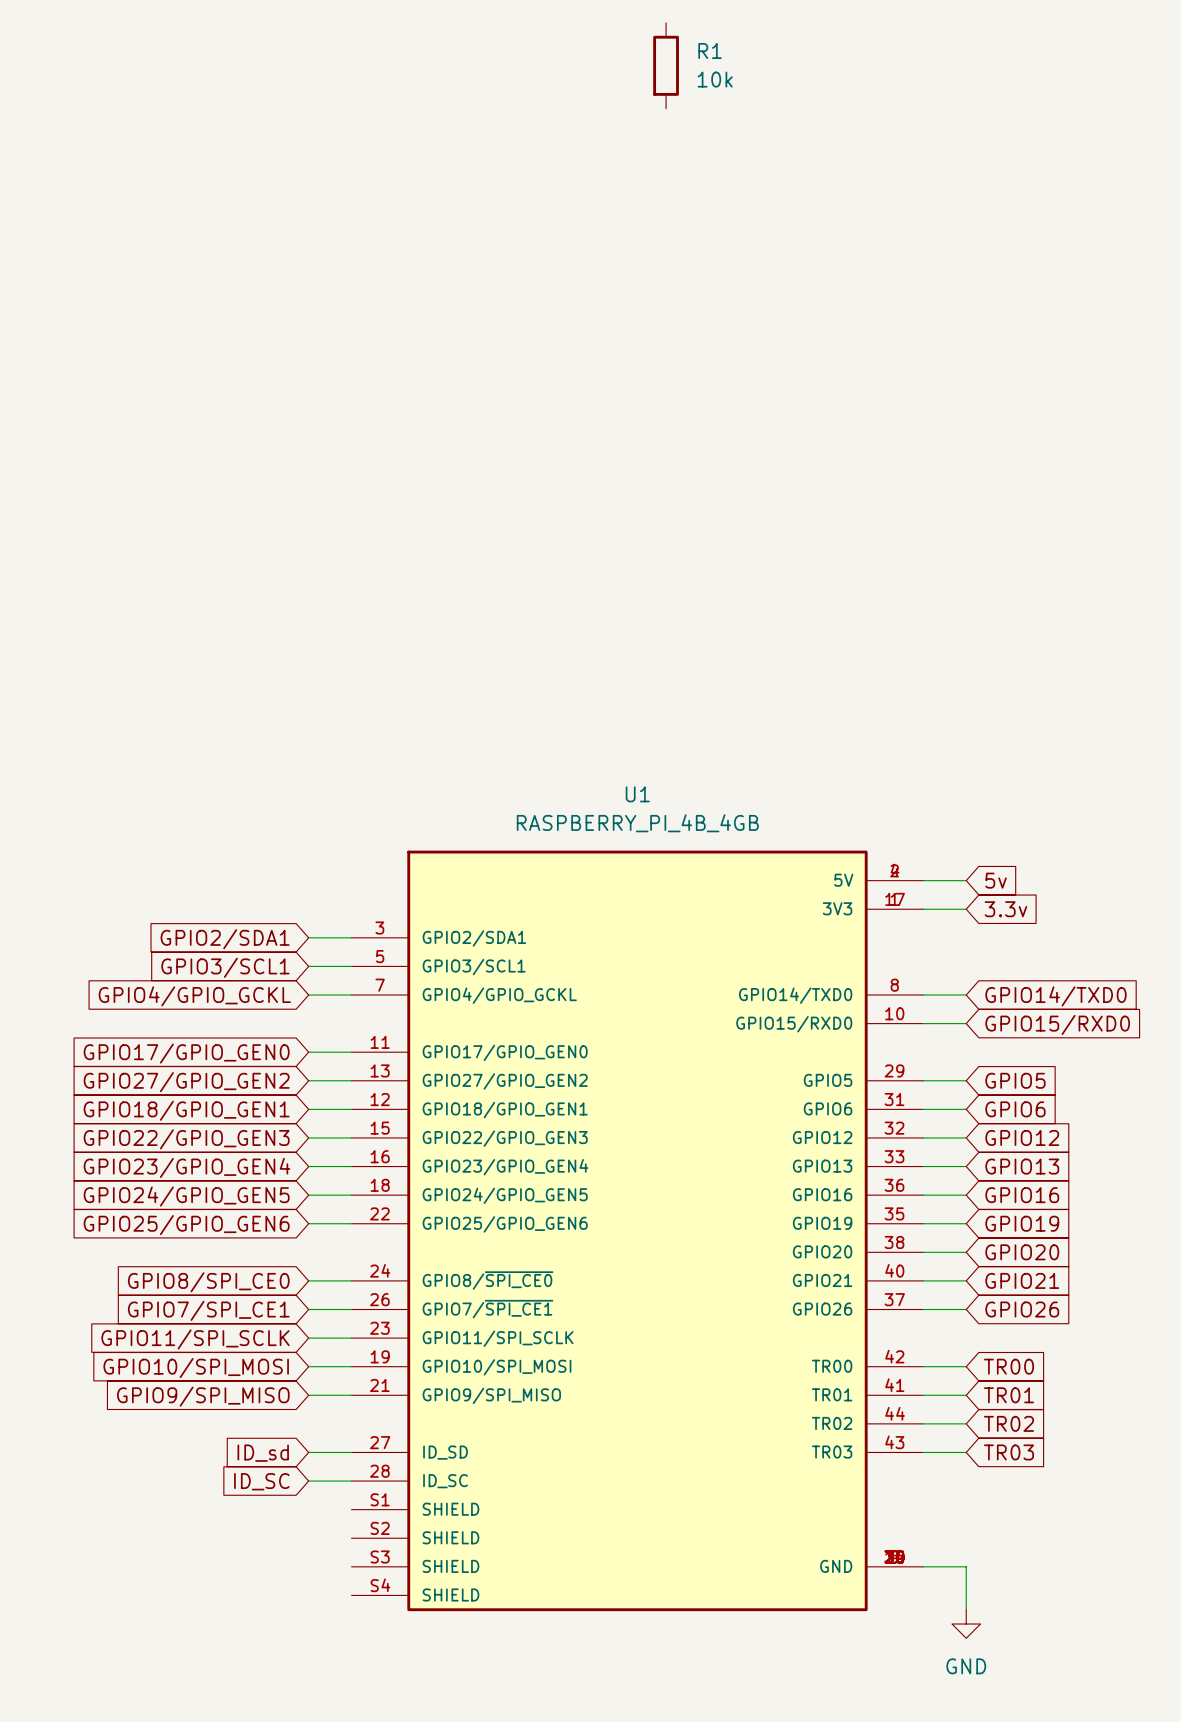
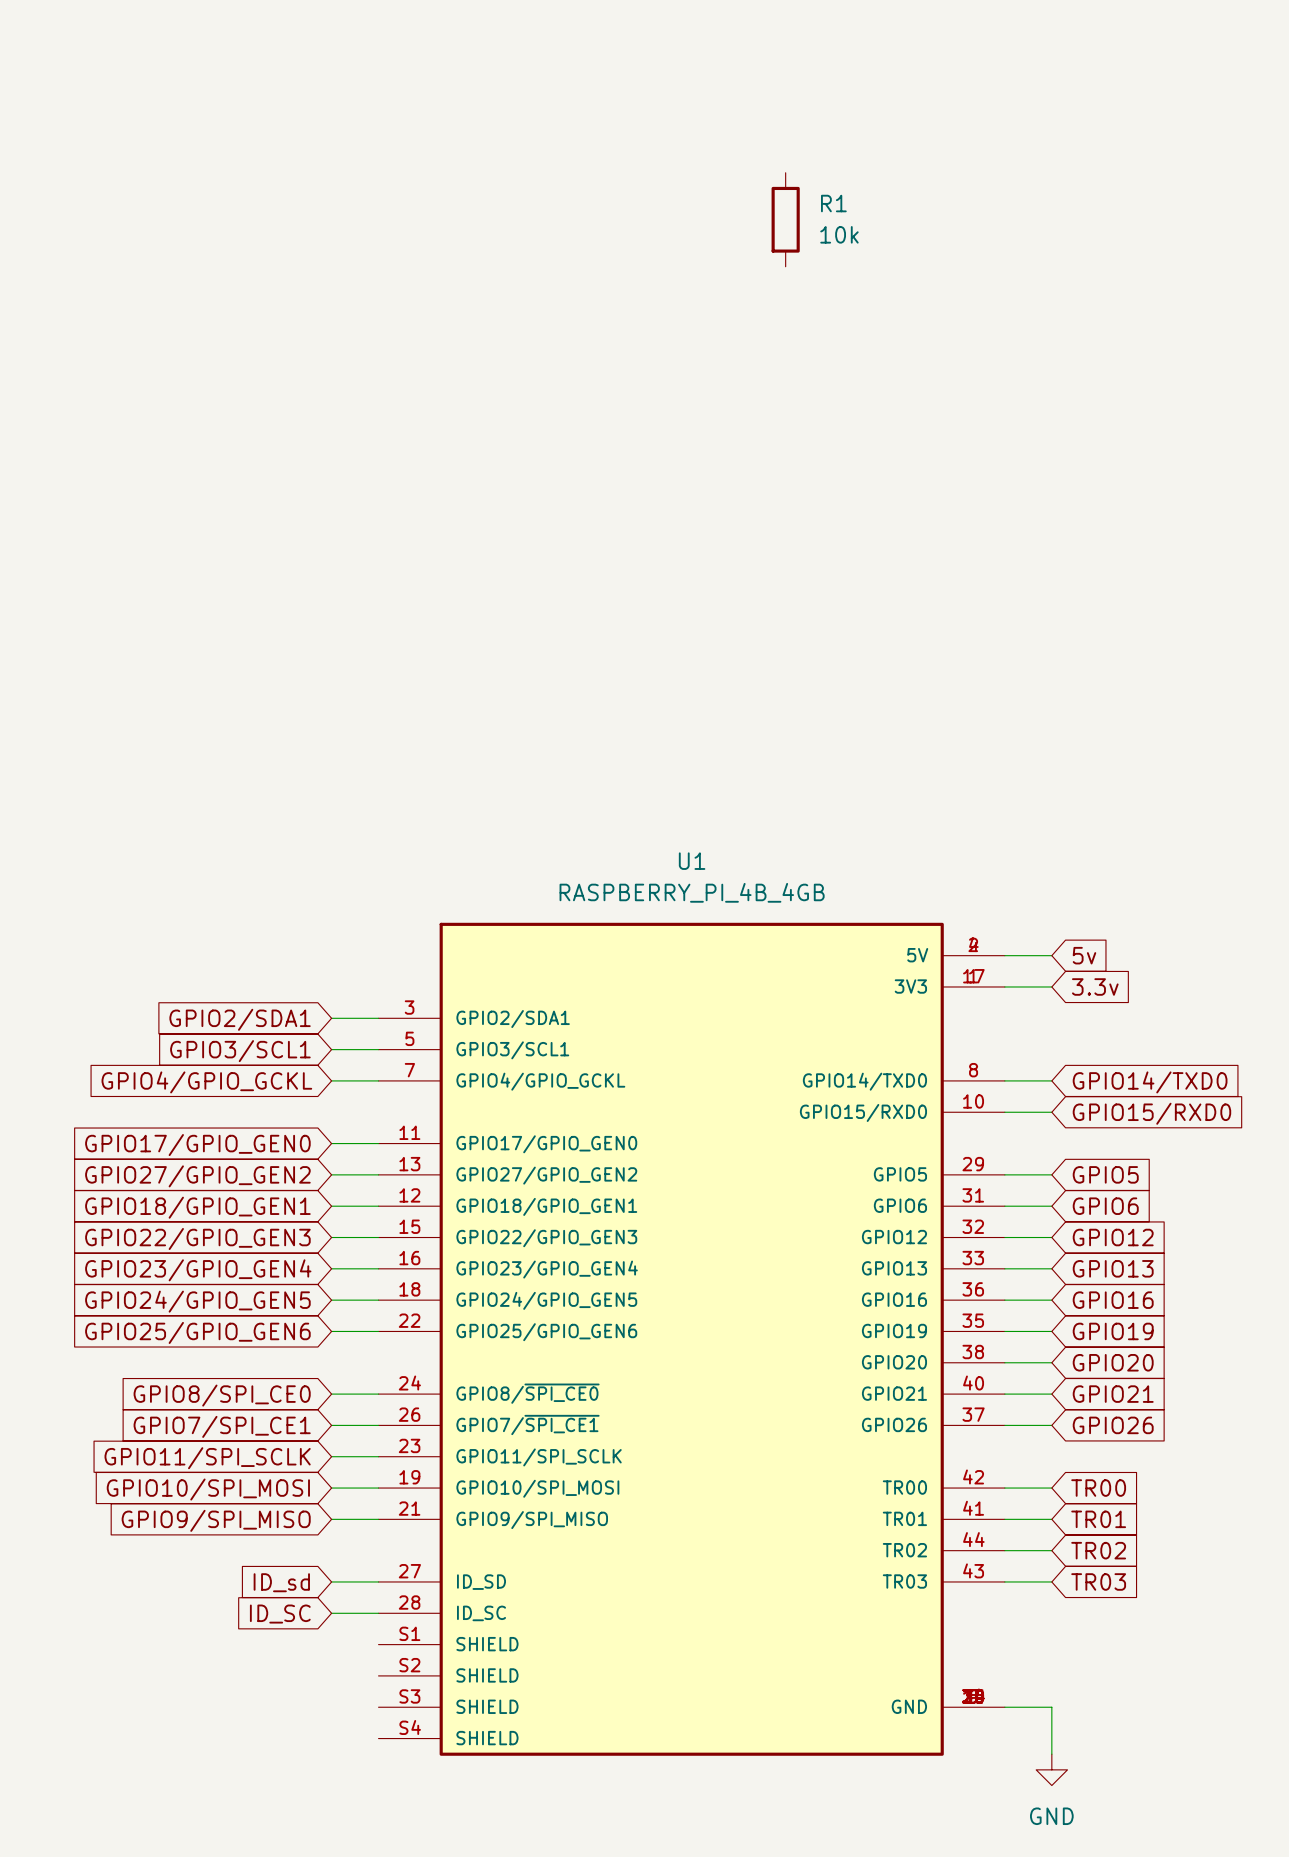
R1 position: (666, 65) -> (785, 219)

